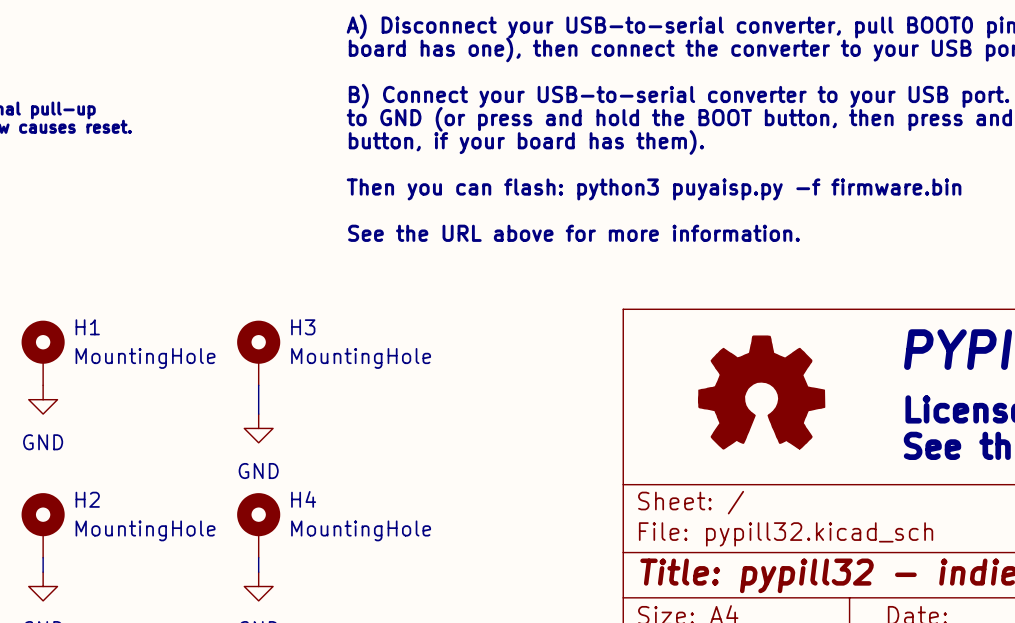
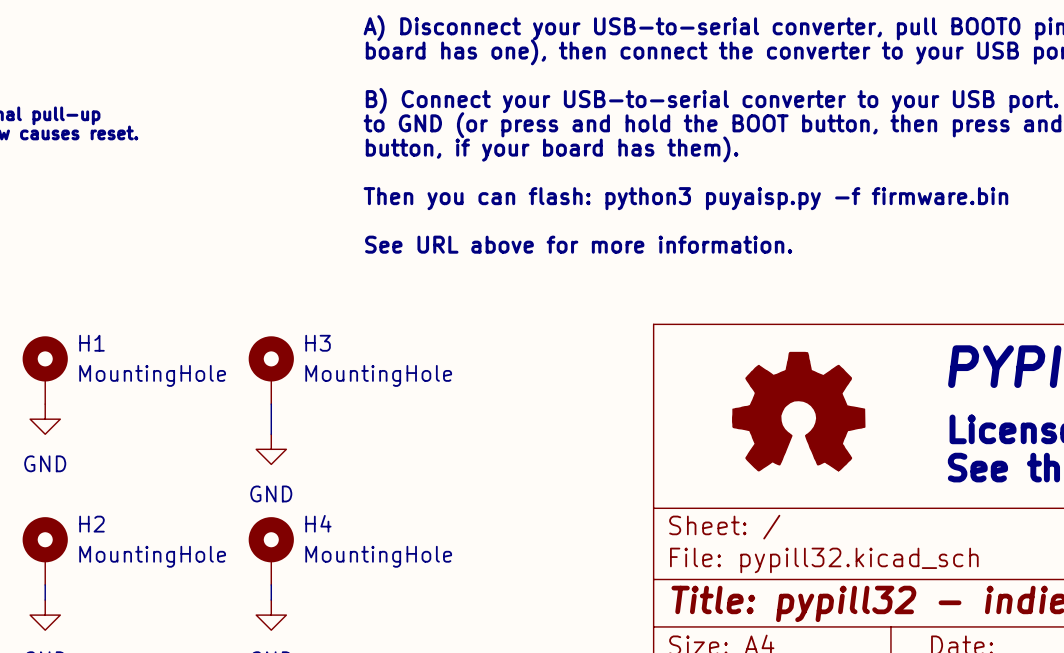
text: See the URL above for more information. (573, 233) -> See URL above for more information. (578, 244)

